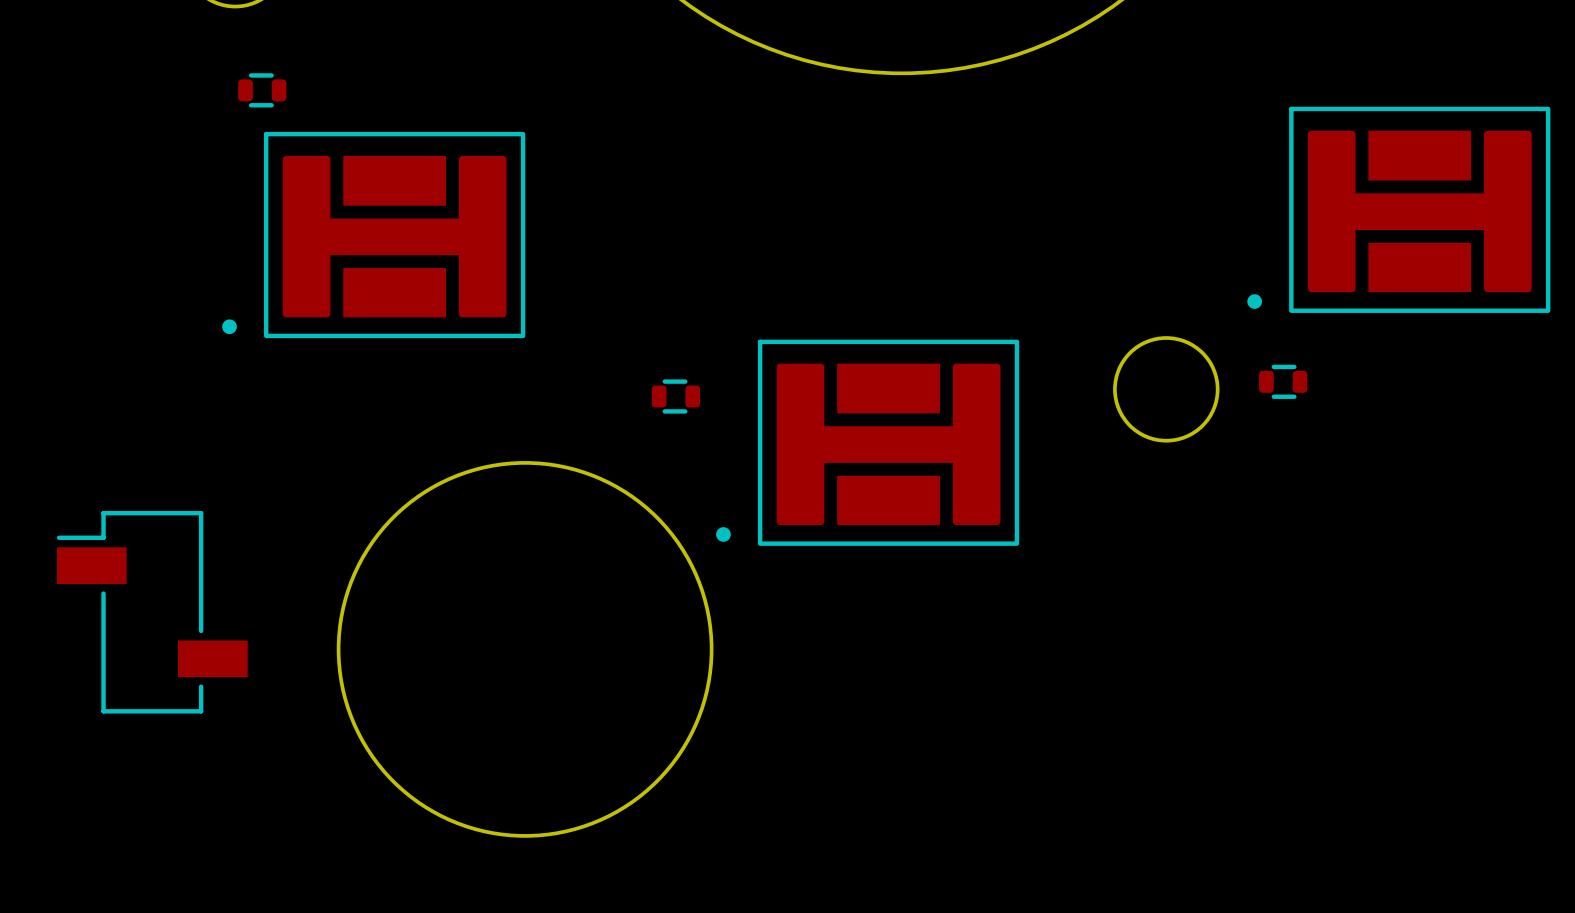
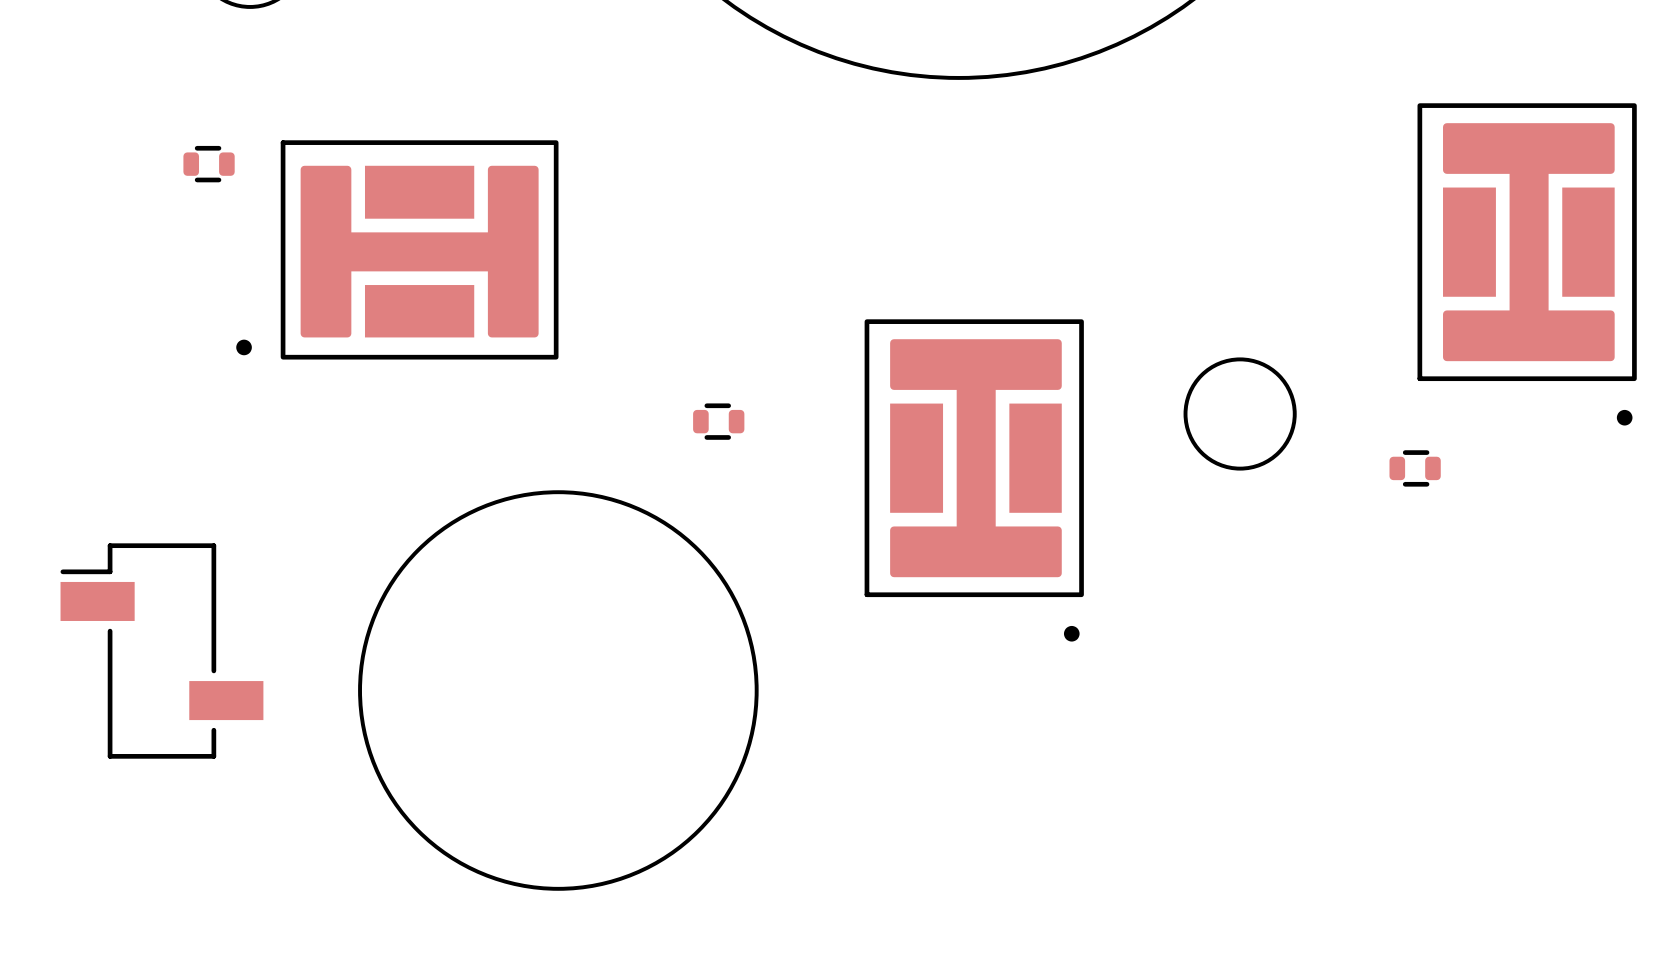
part position: (262, 90) -> (209, 164)
part rotation: 0° (1398, 209) -> 90° counterclockwise (1527, 264)
part position: (1283, 381) -> (1415, 468)
part rotation: 0° (867, 442) -> 90° counterclockwise (974, 480)

